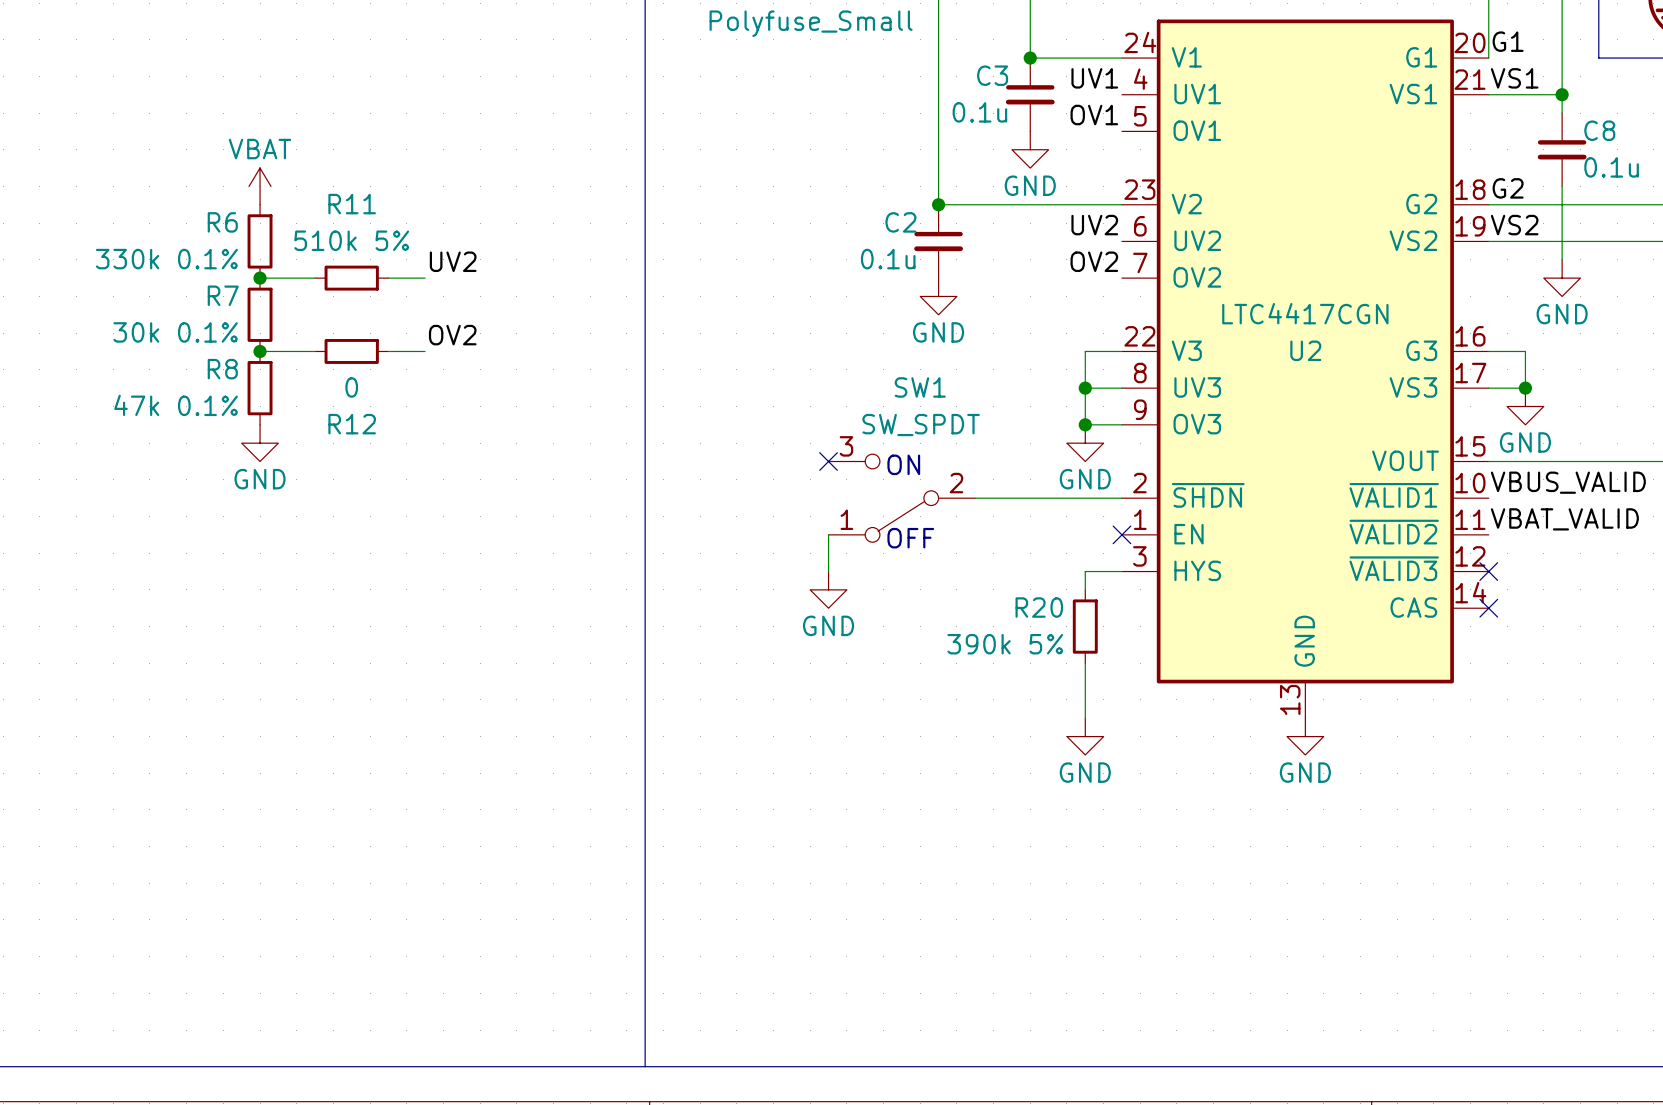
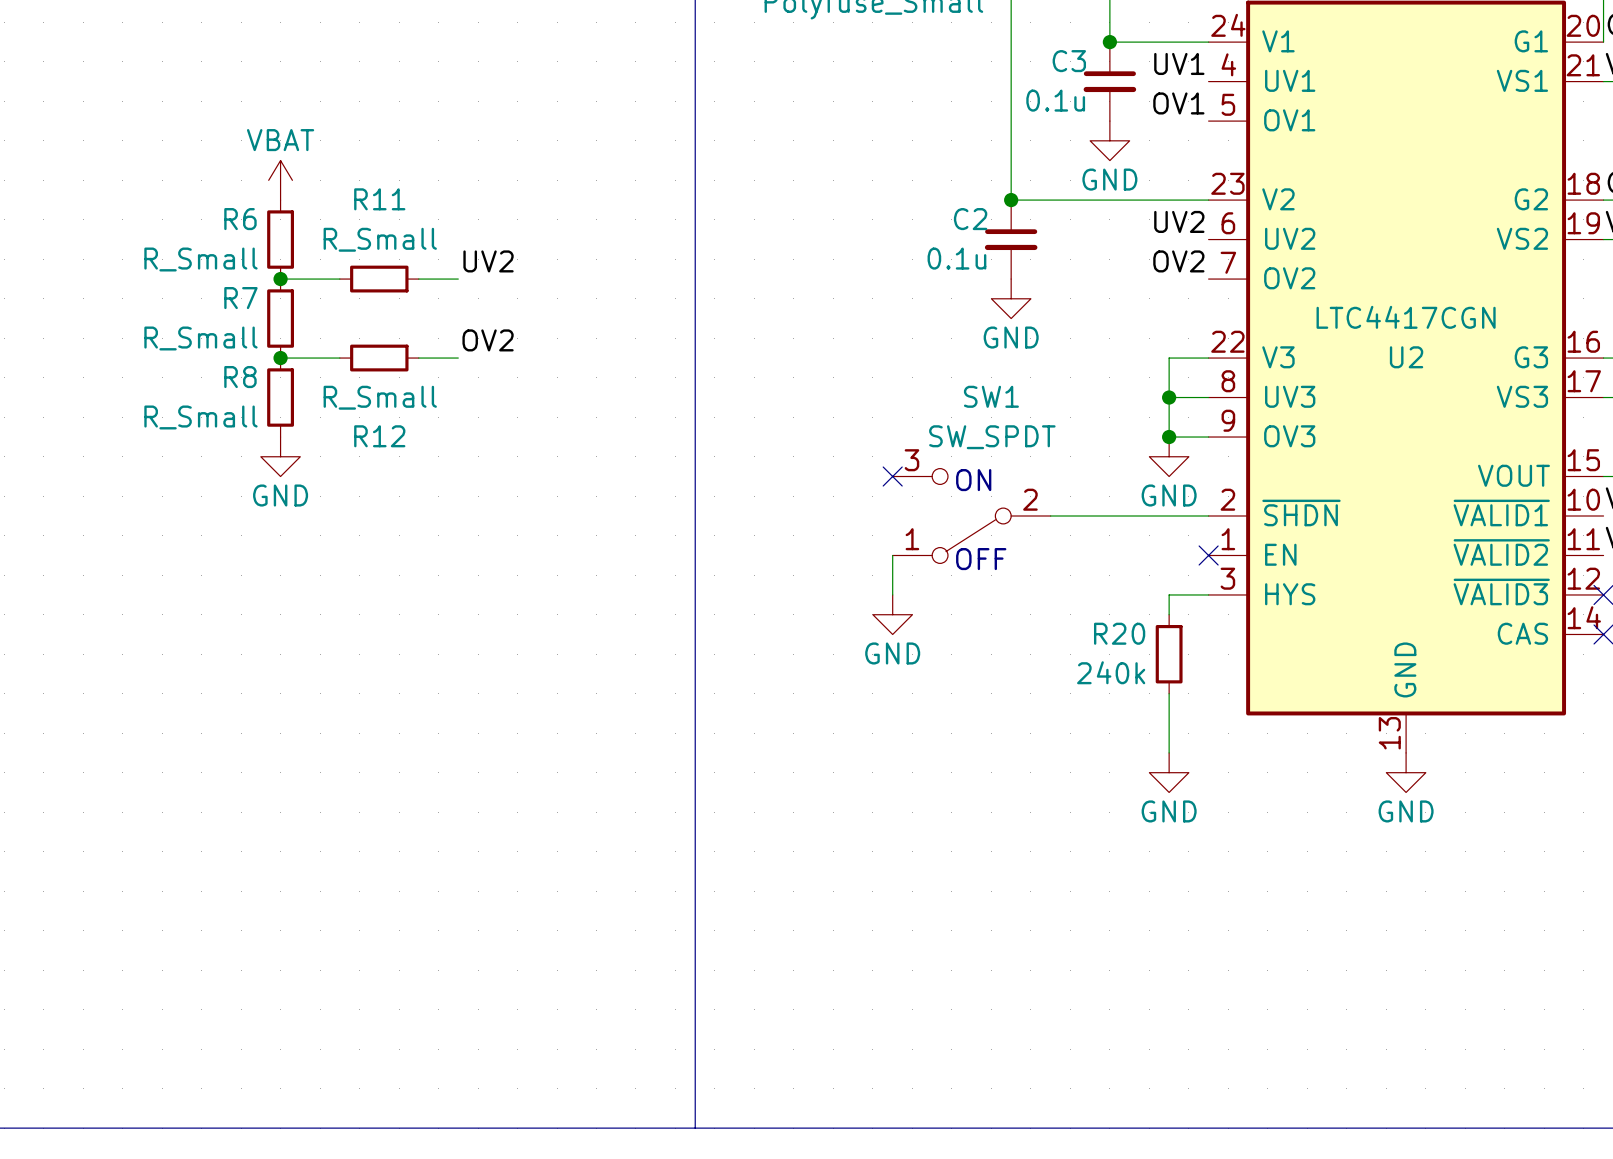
R11 value: 510k 5% (351, 240) -> R_Small (380, 239)
R6 value: 330k 0.1% (166, 259) -> R_Small (200, 259)
R7 value: 30k 0.1% (175, 332) -> R_Small (200, 338)
R12 value: 0 (351, 387) -> R_Small (380, 397)
R8 value: 47k 0.1% (176, 405) -> R_Small (200, 417)
R20 value: 390k 5% (1005, 644) -> 240k (1111, 672)

